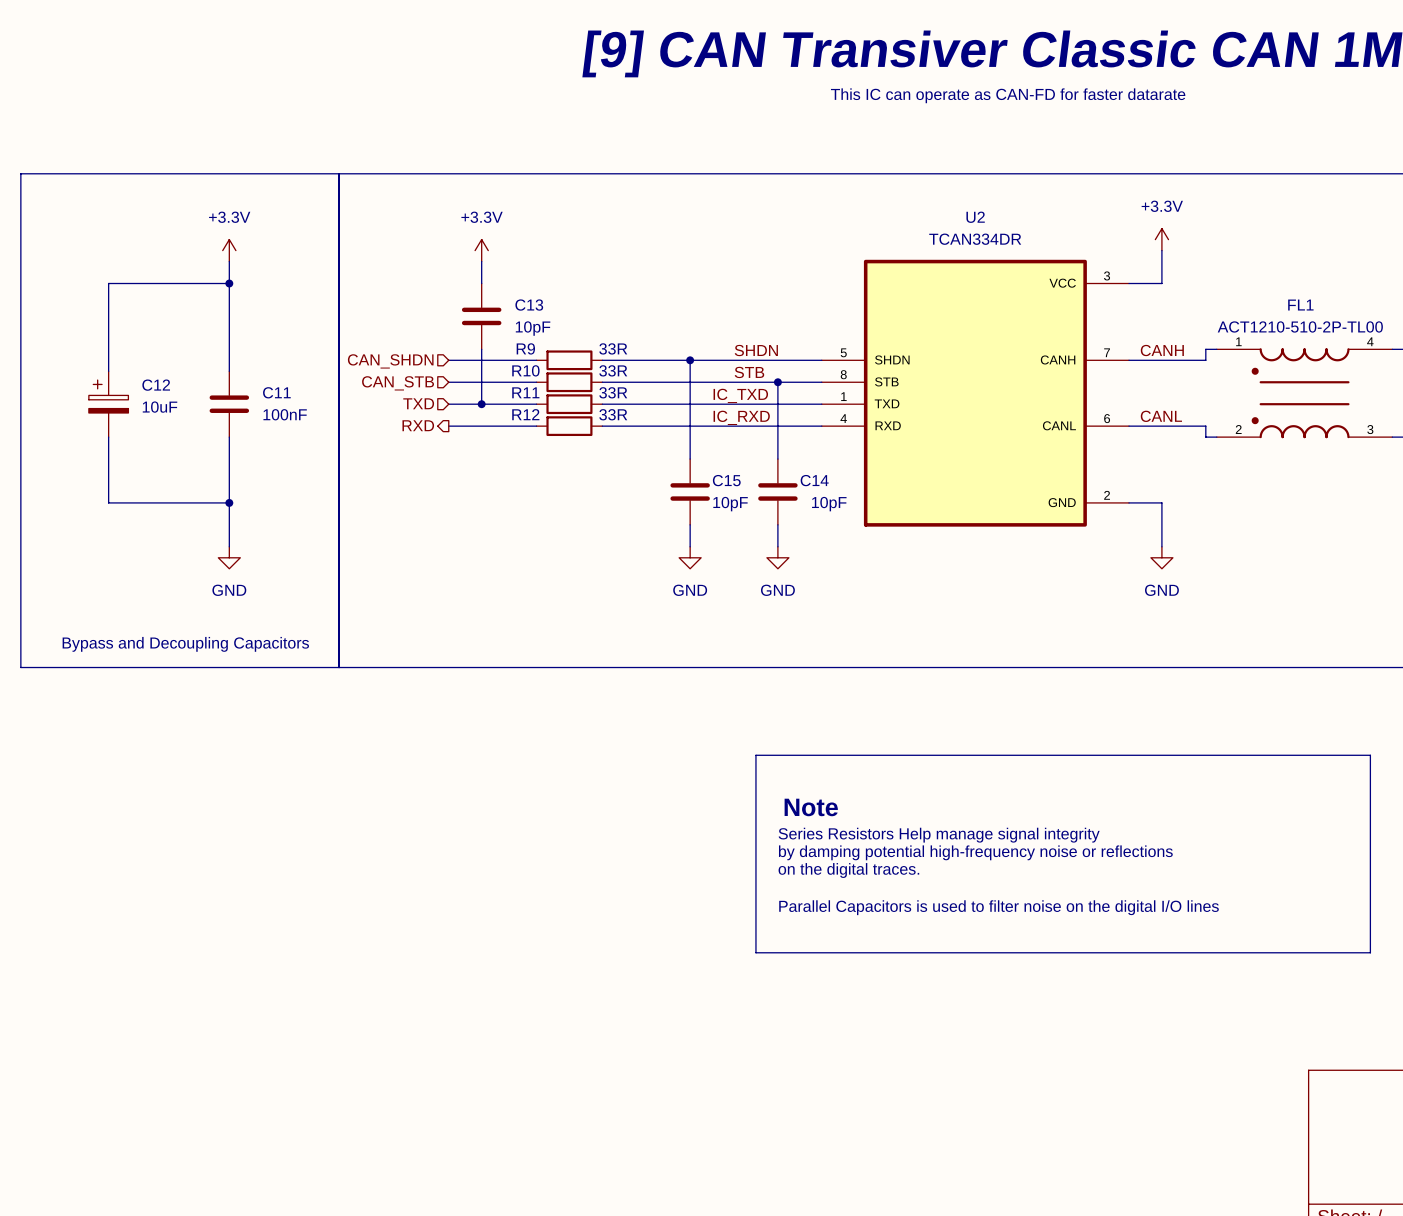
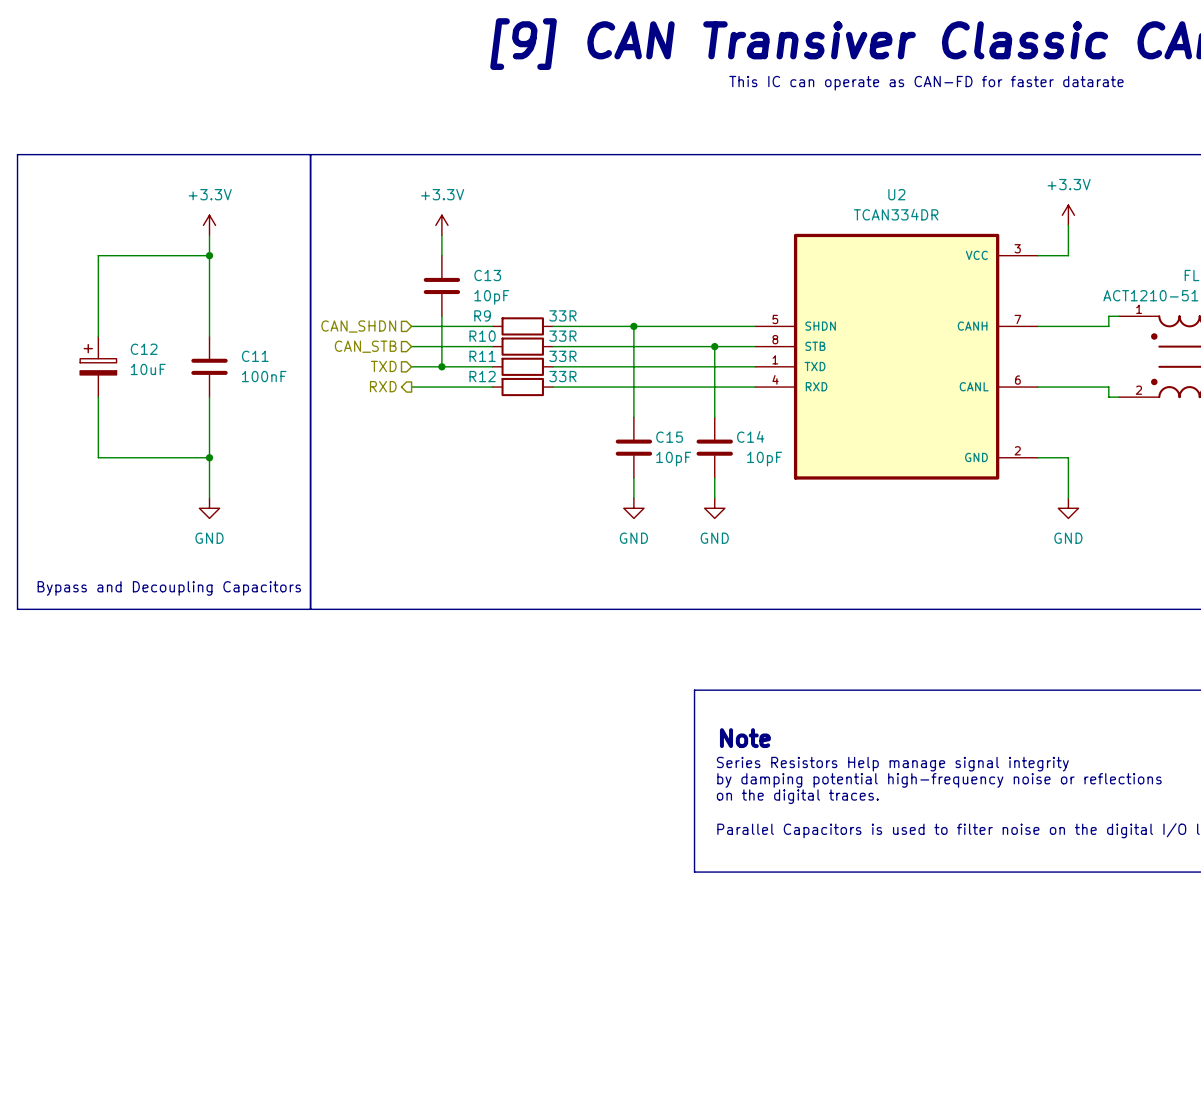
label: SHDN (756, 350) -> none
label: CANH (1162, 350) -> none
label: STB (749, 372) -> none
label: IC_TXD (740, 395) -> none
label: CANL (1161, 416) -> none
label: IC_RXD (741, 417) -> none

